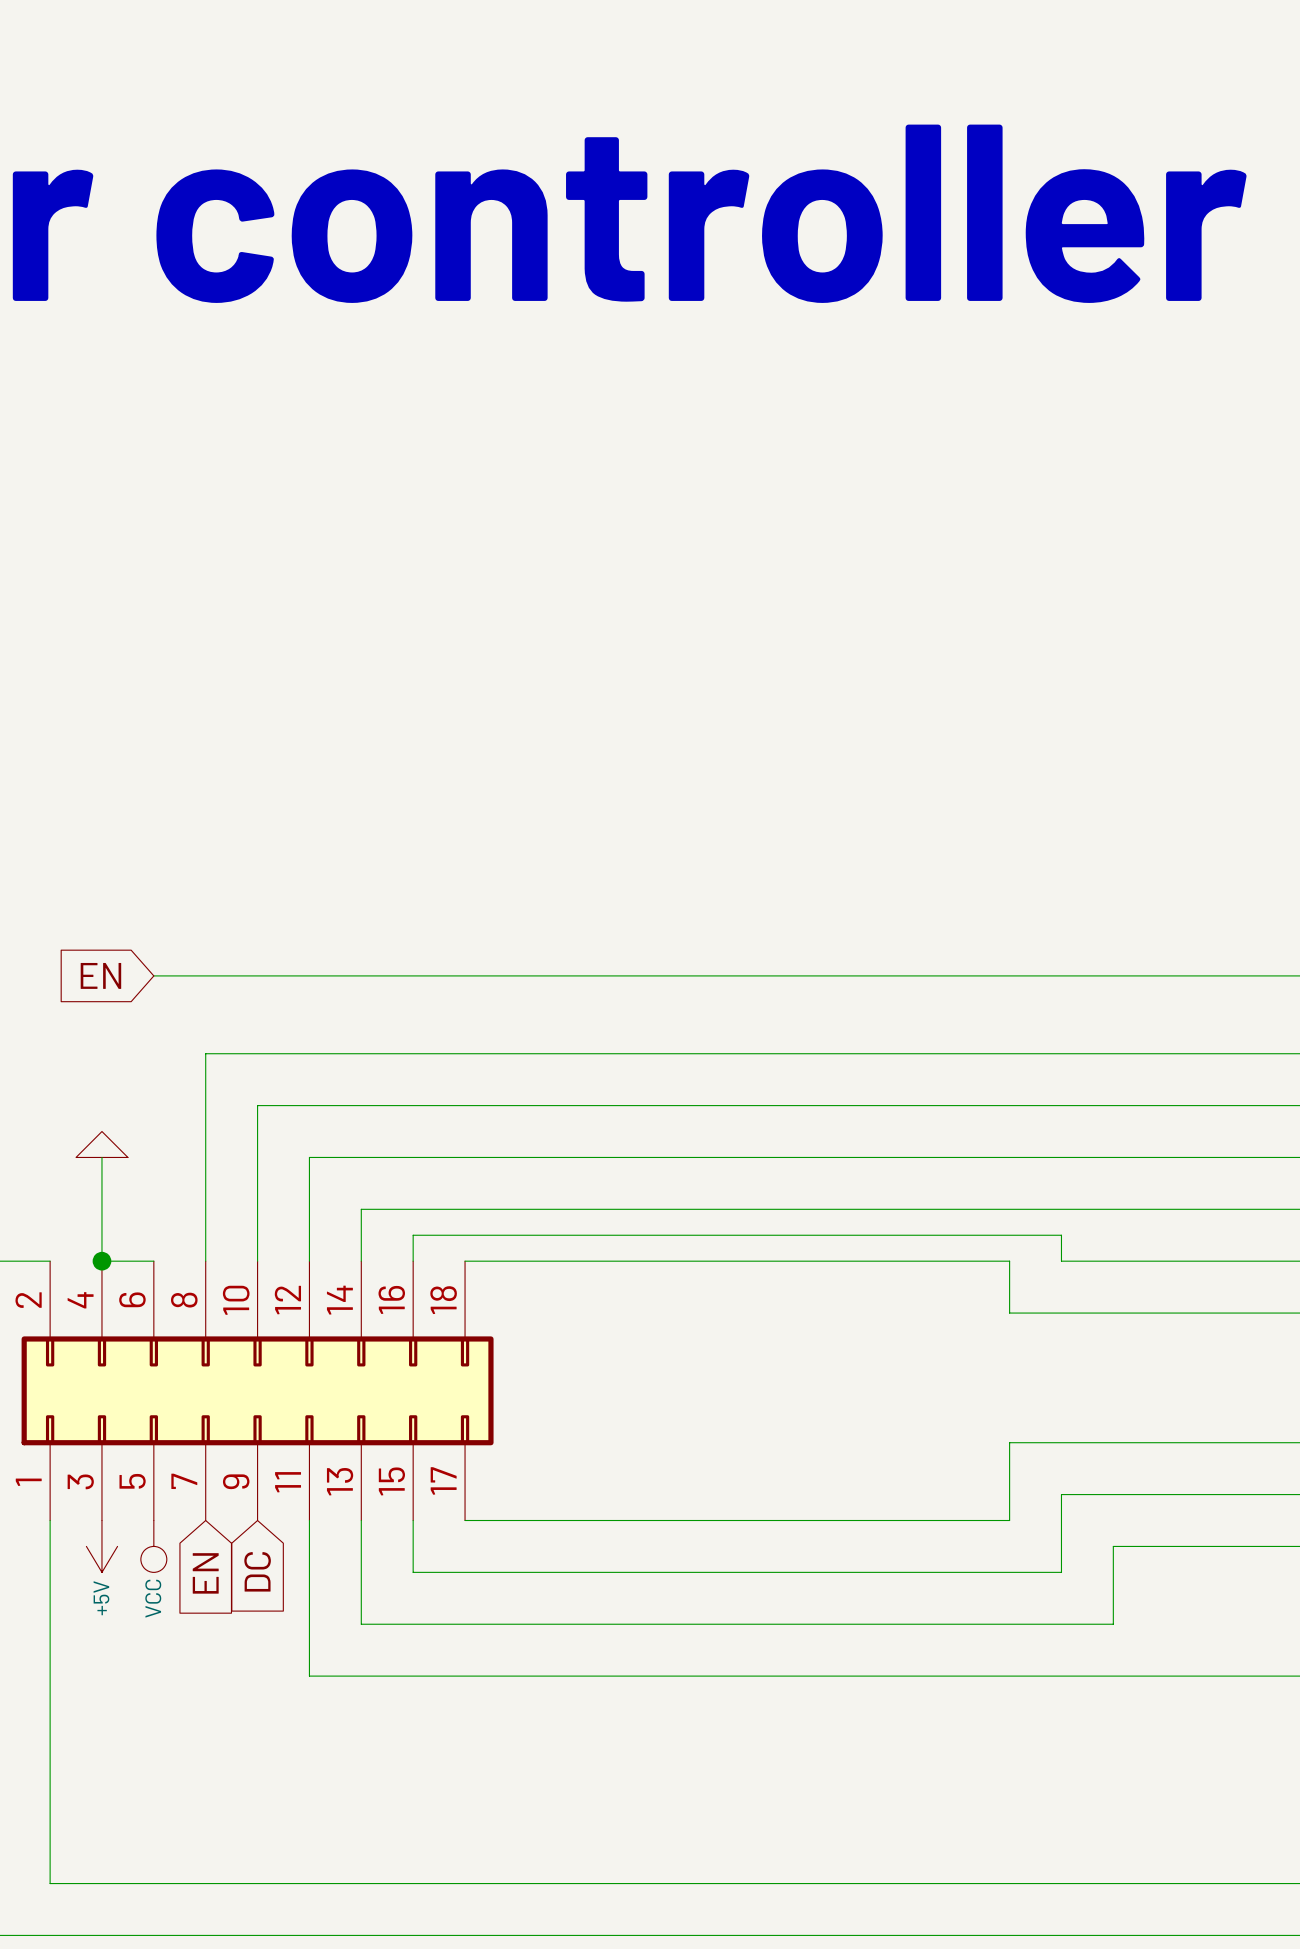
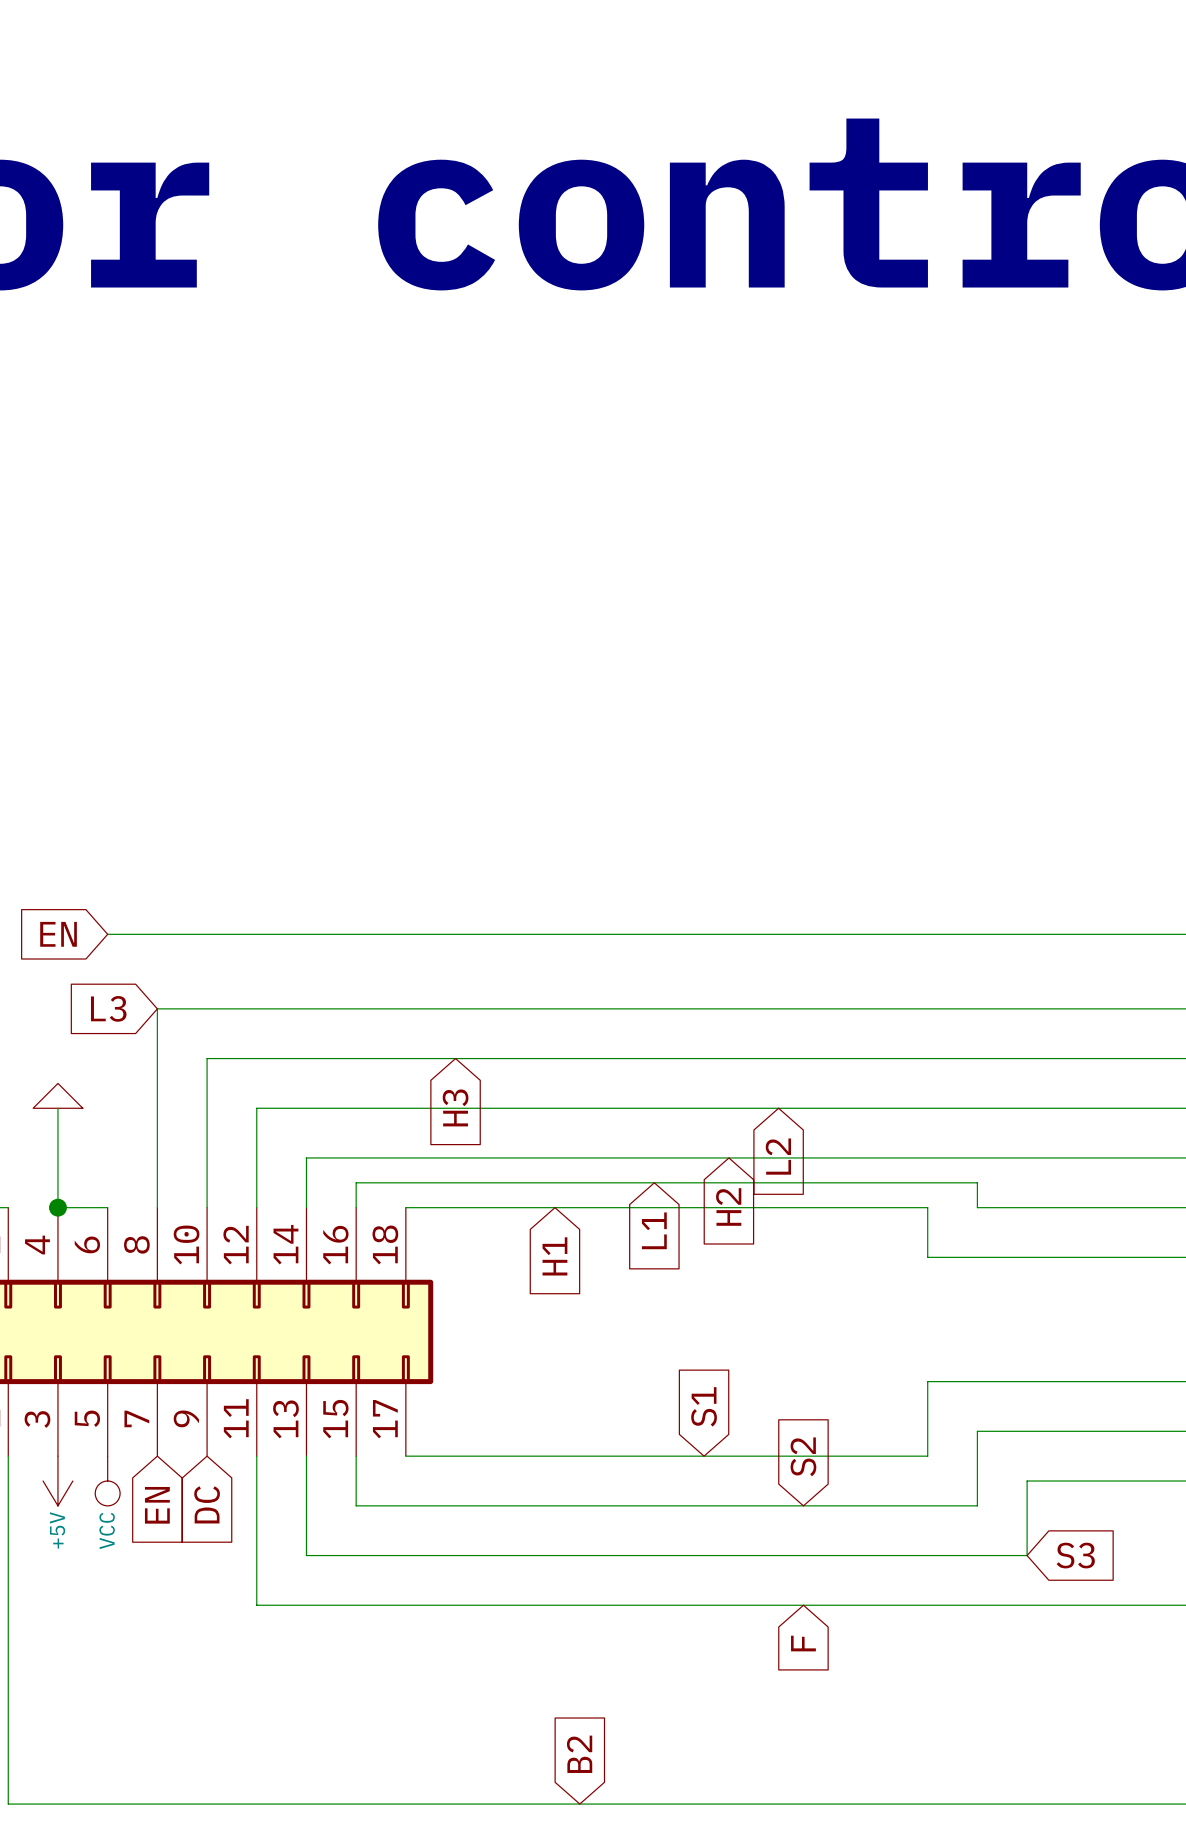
global label: none -> L3 (108, 1008)
global label: none -> H3 (455, 1107)
global label: none -> L2 (778, 1156)
global label: none -> H2 (728, 1206)
global label: none -> L1 (654, 1230)
global label: none -> H1 (554, 1256)
global label: none -> S1 (704, 1406)
global label: none -> S2 (803, 1456)
global label: none -> S3 (1075, 1555)
global label: none -> F (803, 1643)
global label: none -> B2 (579, 1754)

